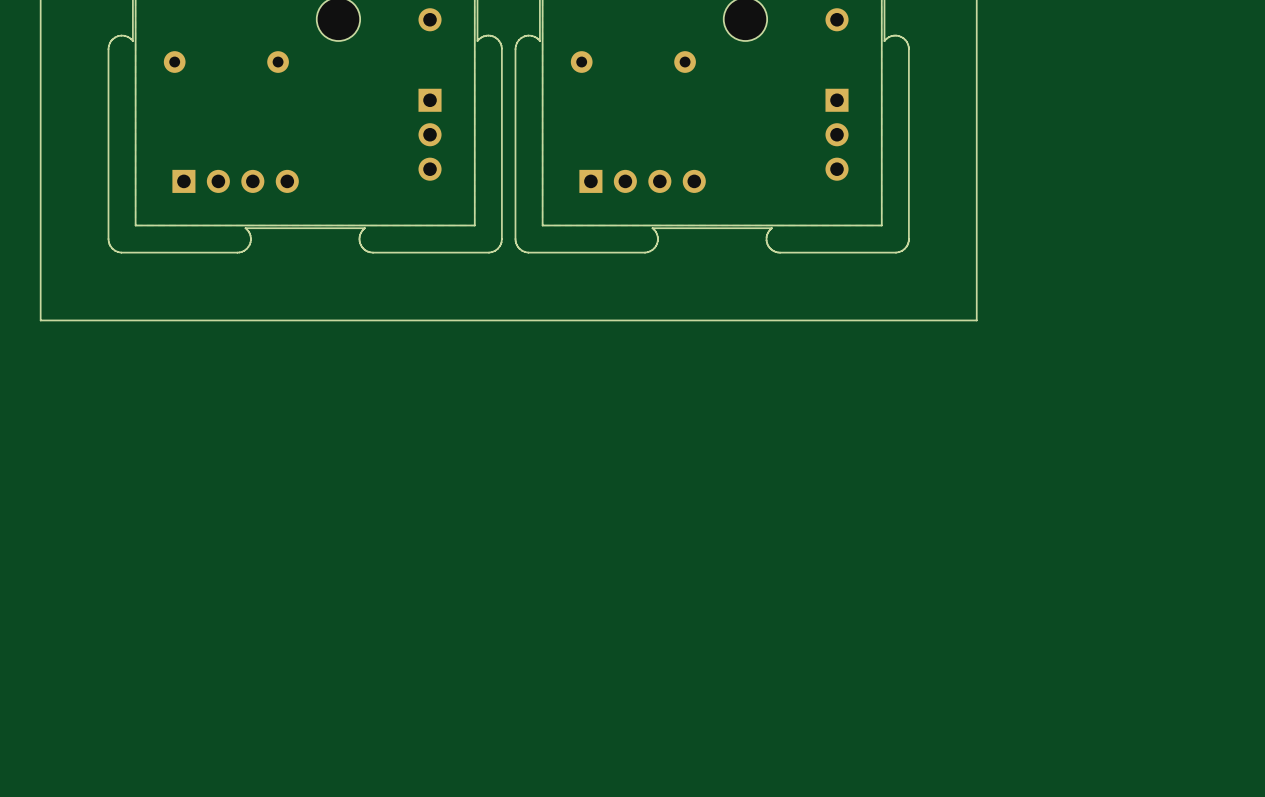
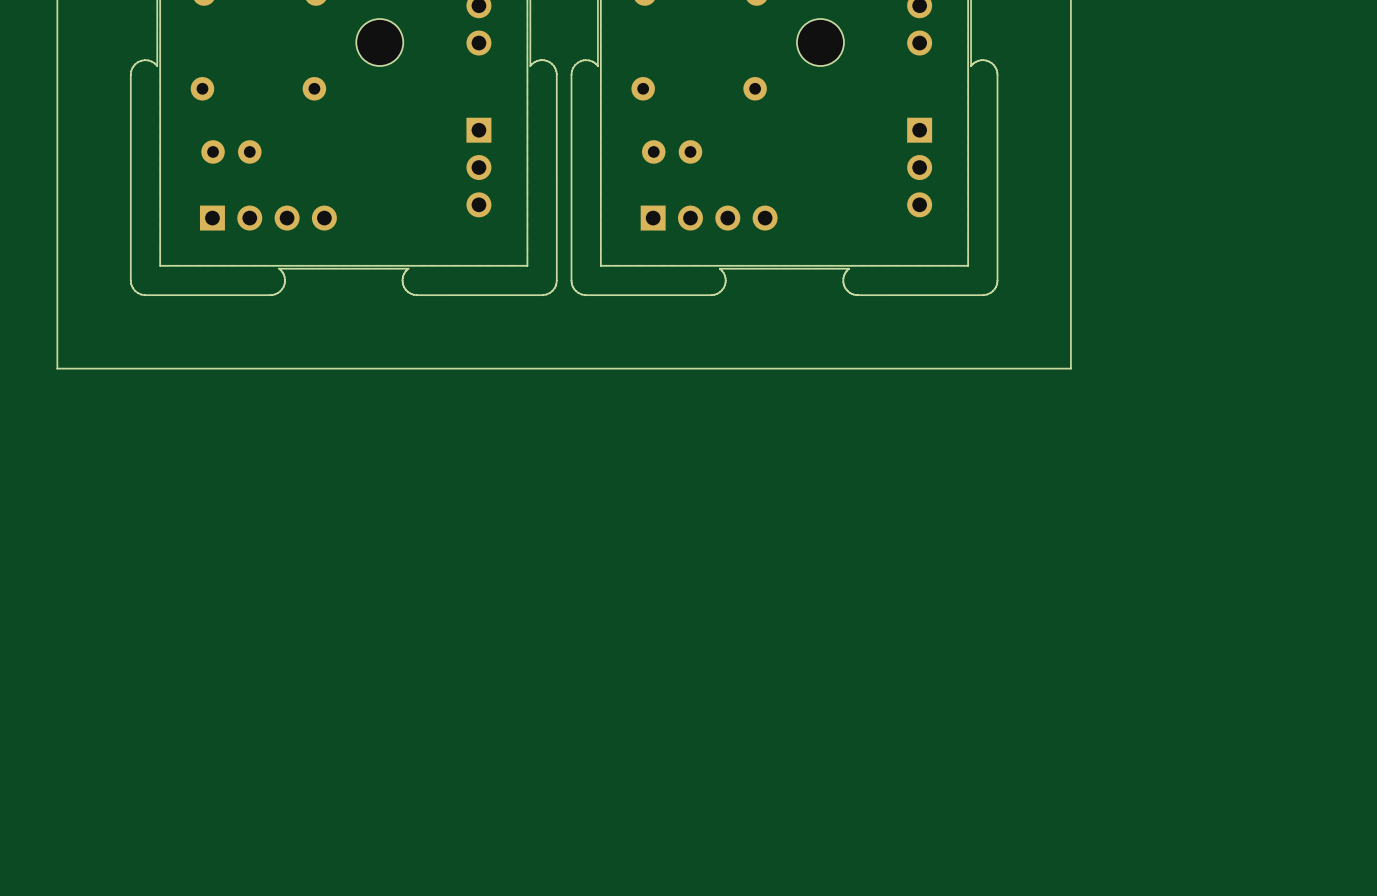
part: none -> (231, 151)
part: none -> (672, 151)

